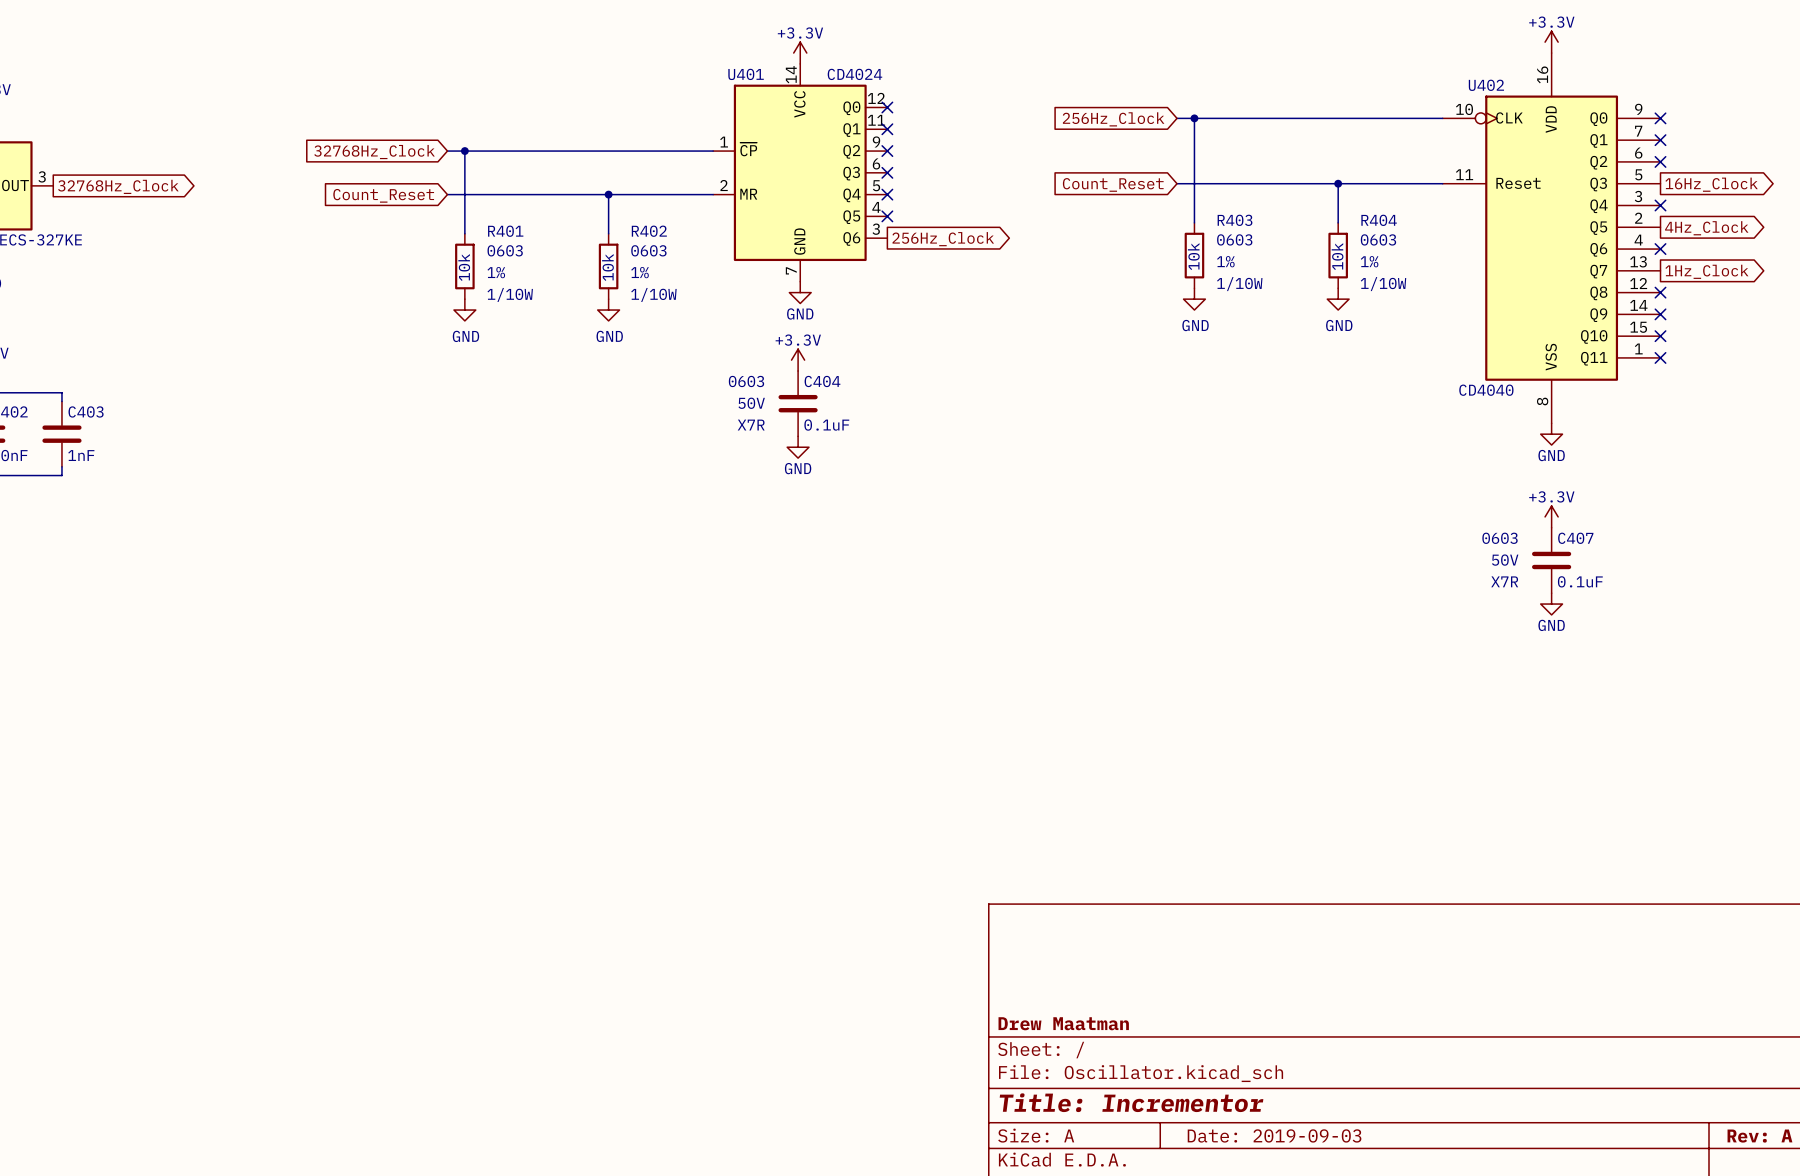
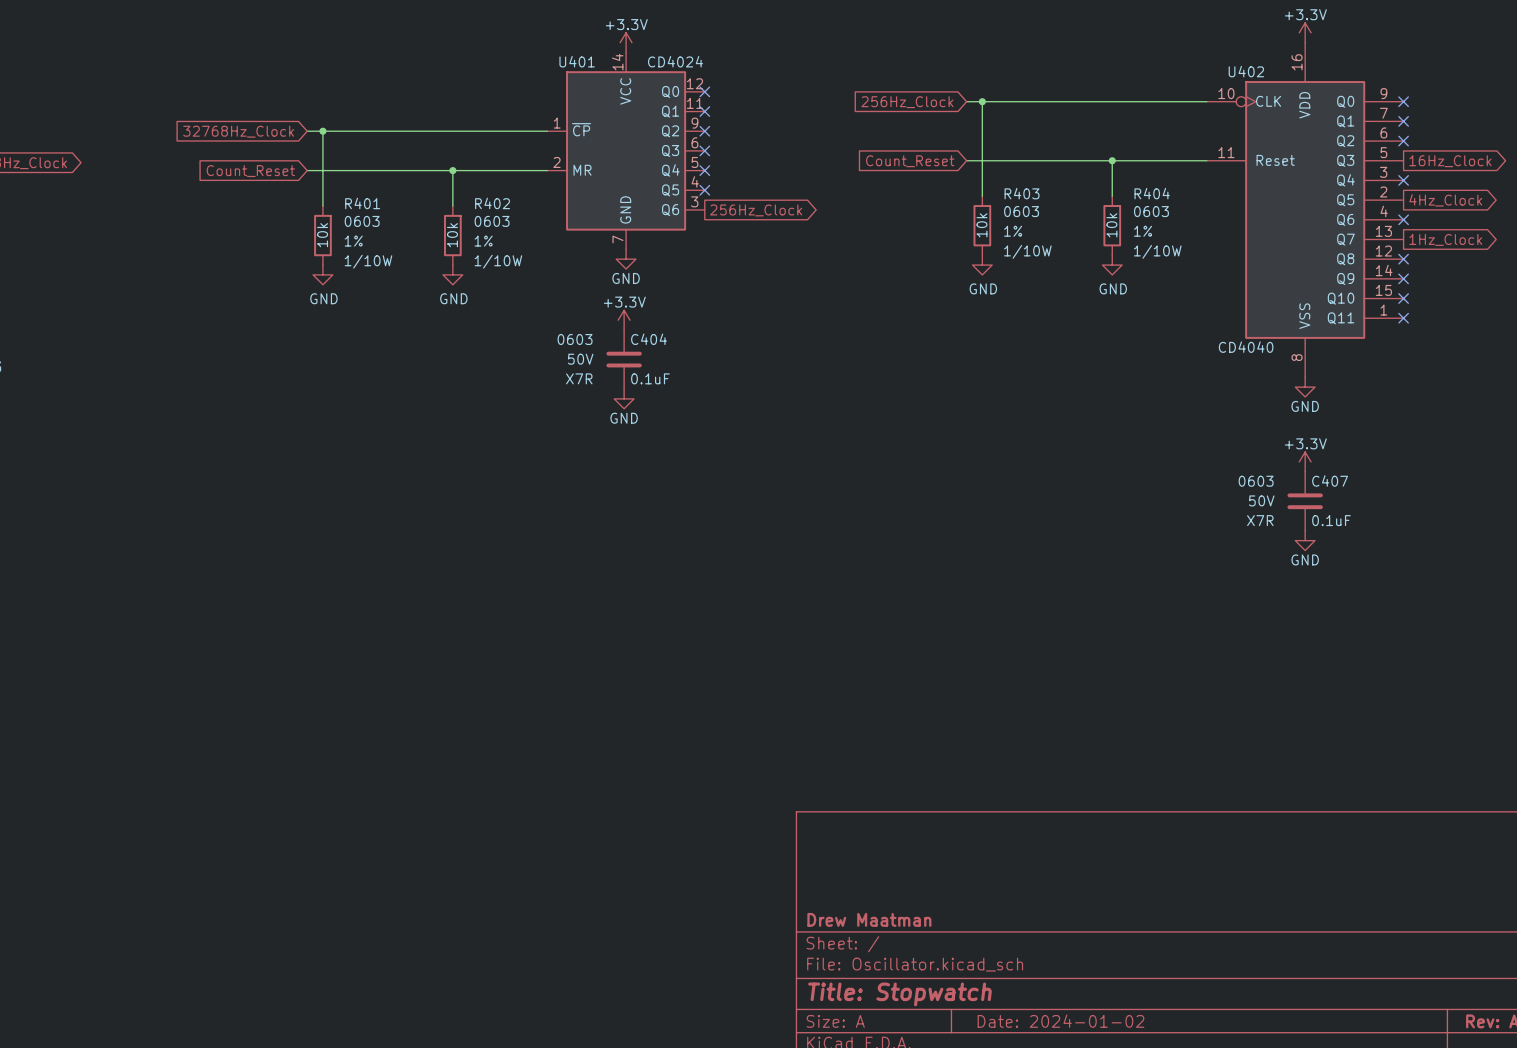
title block: Title: Incrementor (1131, 1102) -> Title: Stopwatch (899, 994)
title block: Date: 2019-09-03 (1274, 1135) -> Date: 2024-01-02 (1060, 1021)

